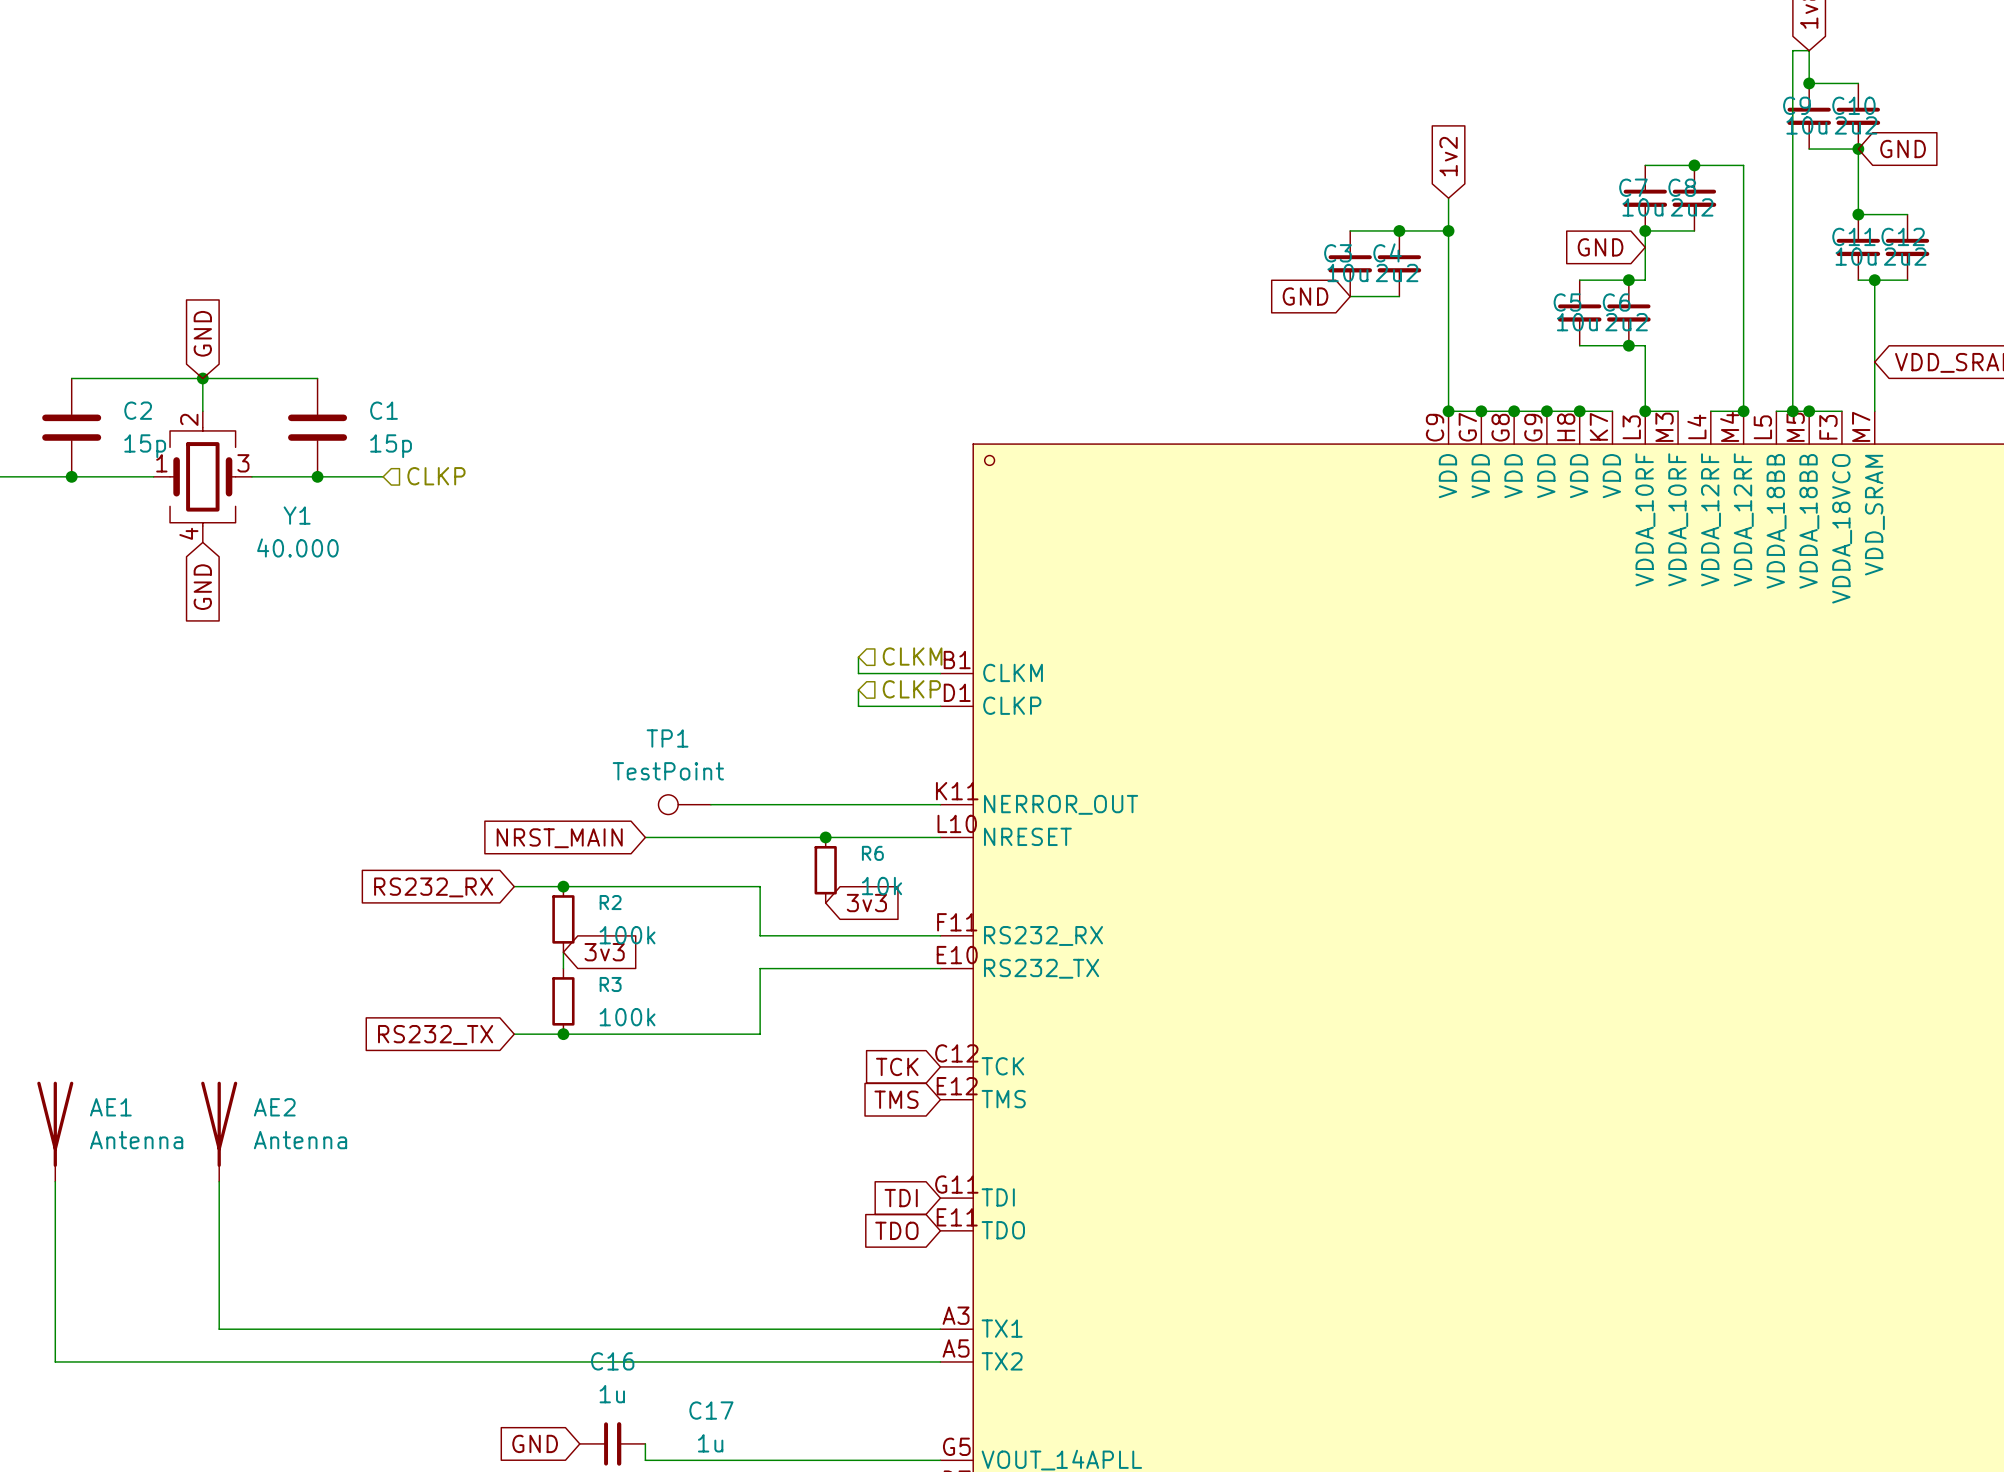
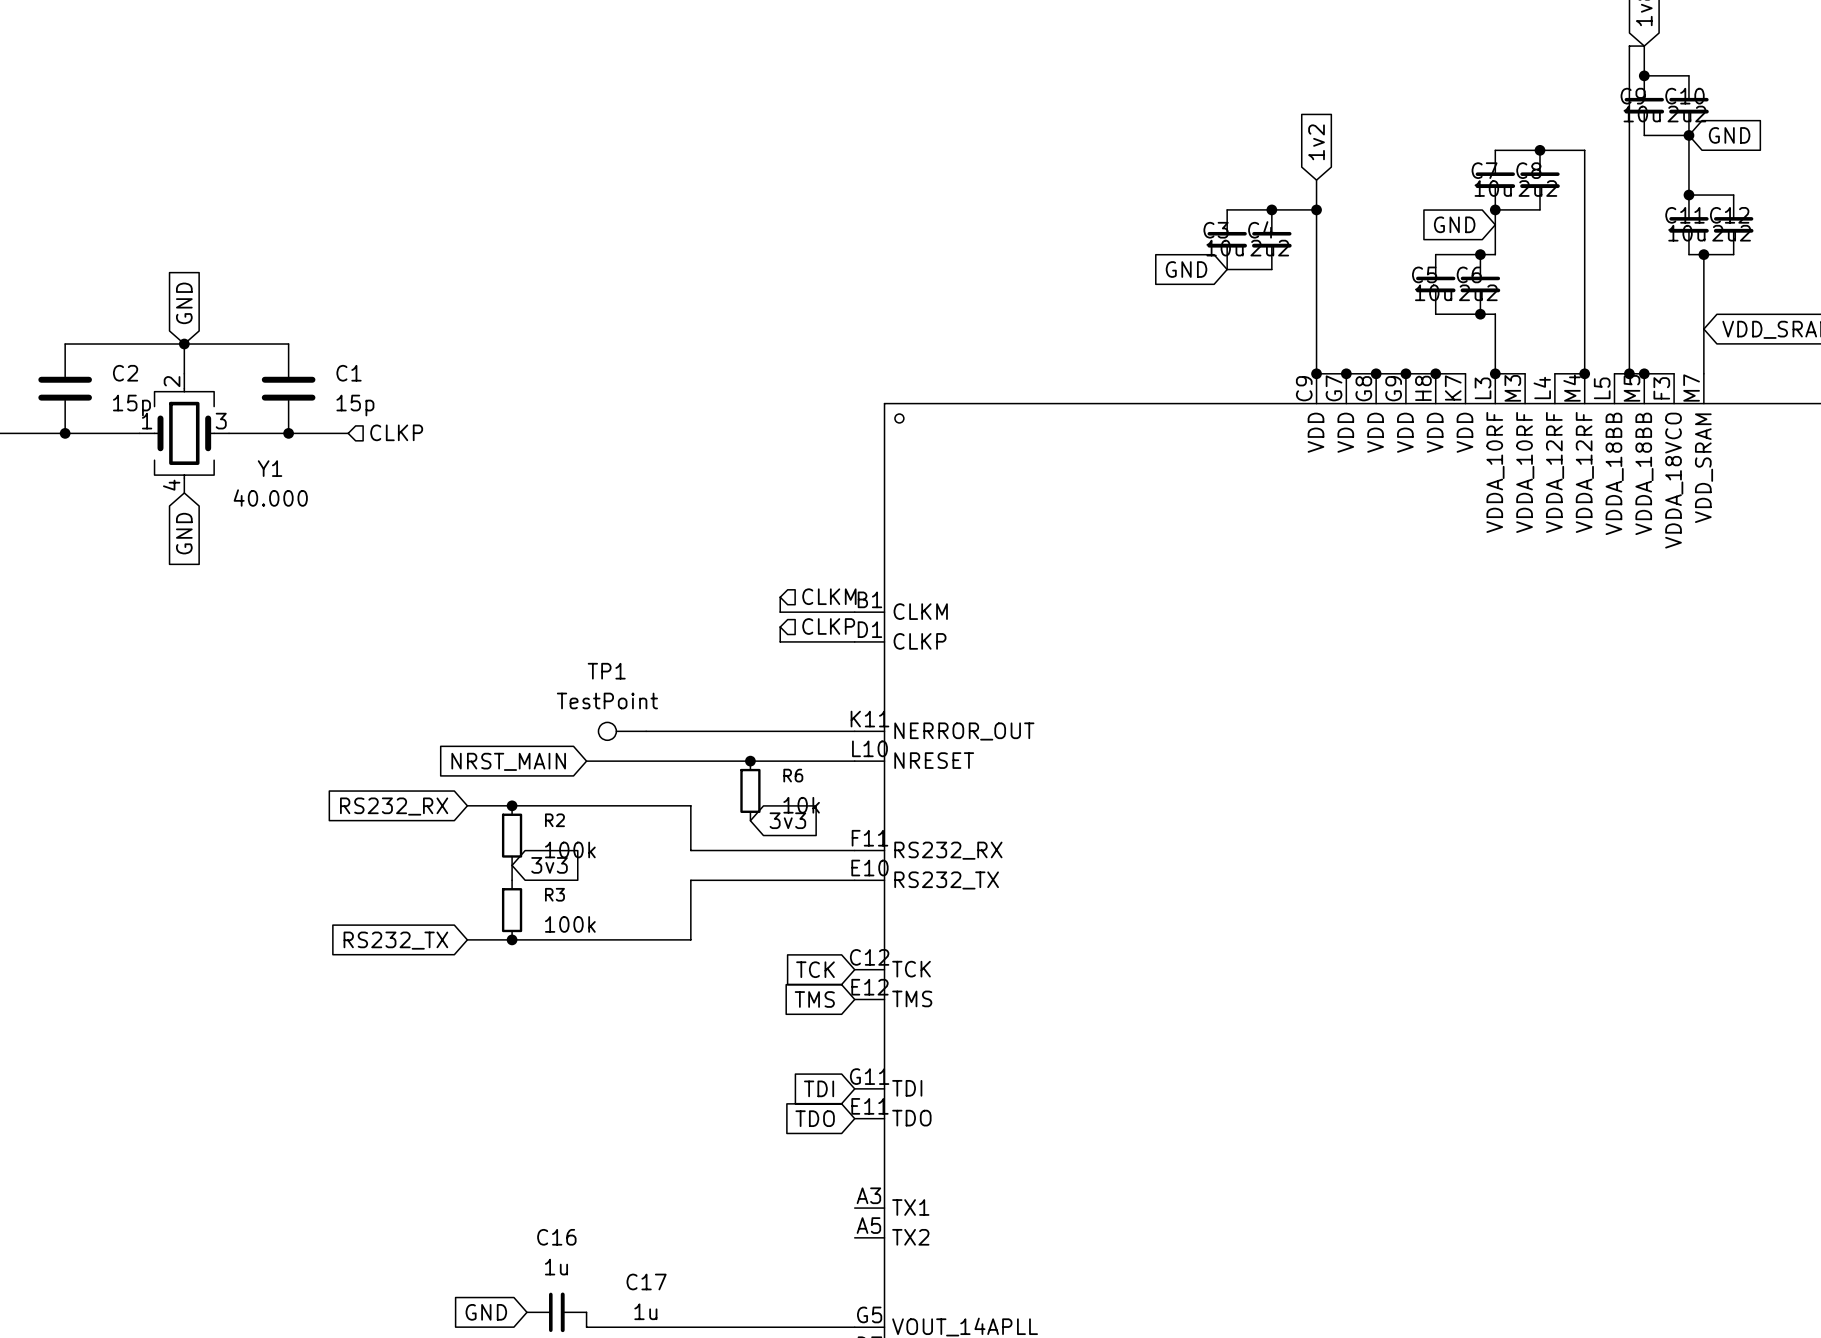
AE1: Antenna (55, 1131) -> none
AE2: Antenna (219, 1131) -> none
wire: (55, 1181) (55, 1361) (940, 1361) -> none
wire: (219, 1181) (219, 1329) (940, 1329) -> none

